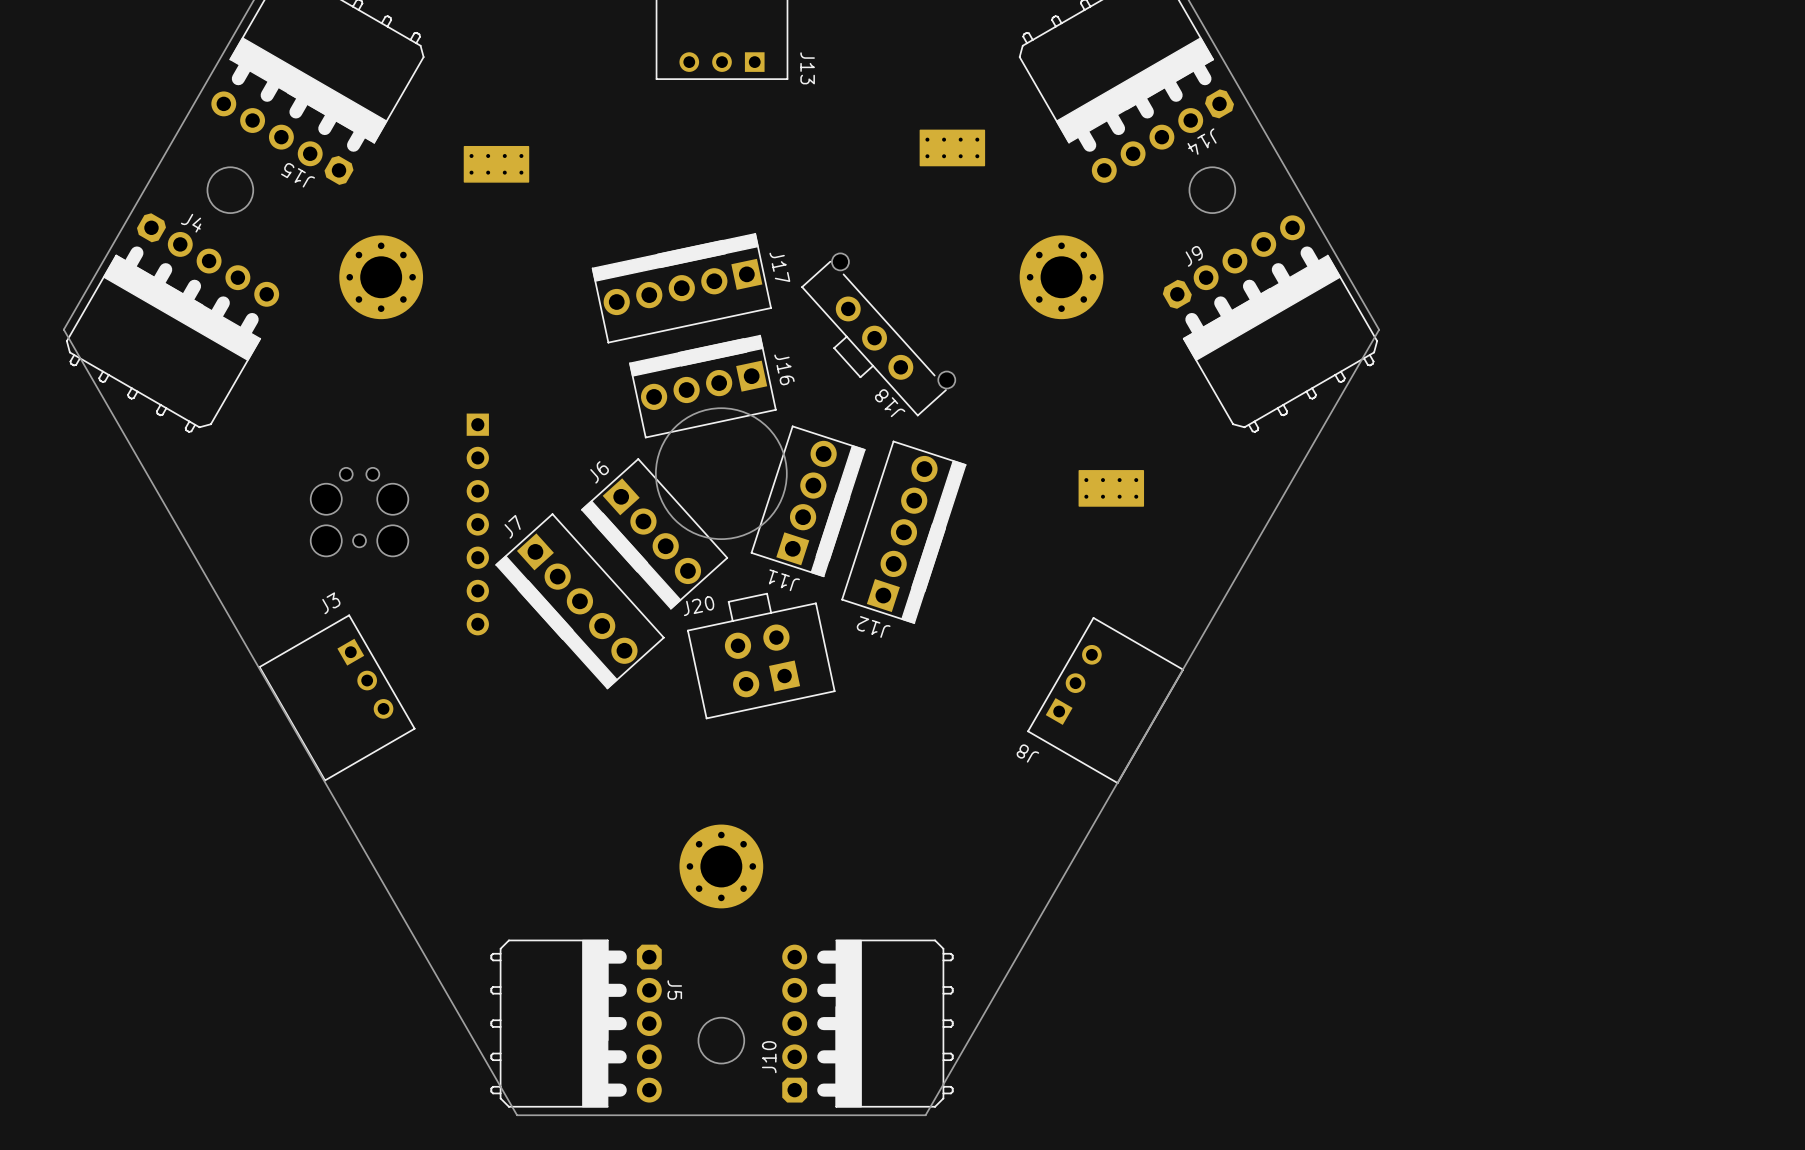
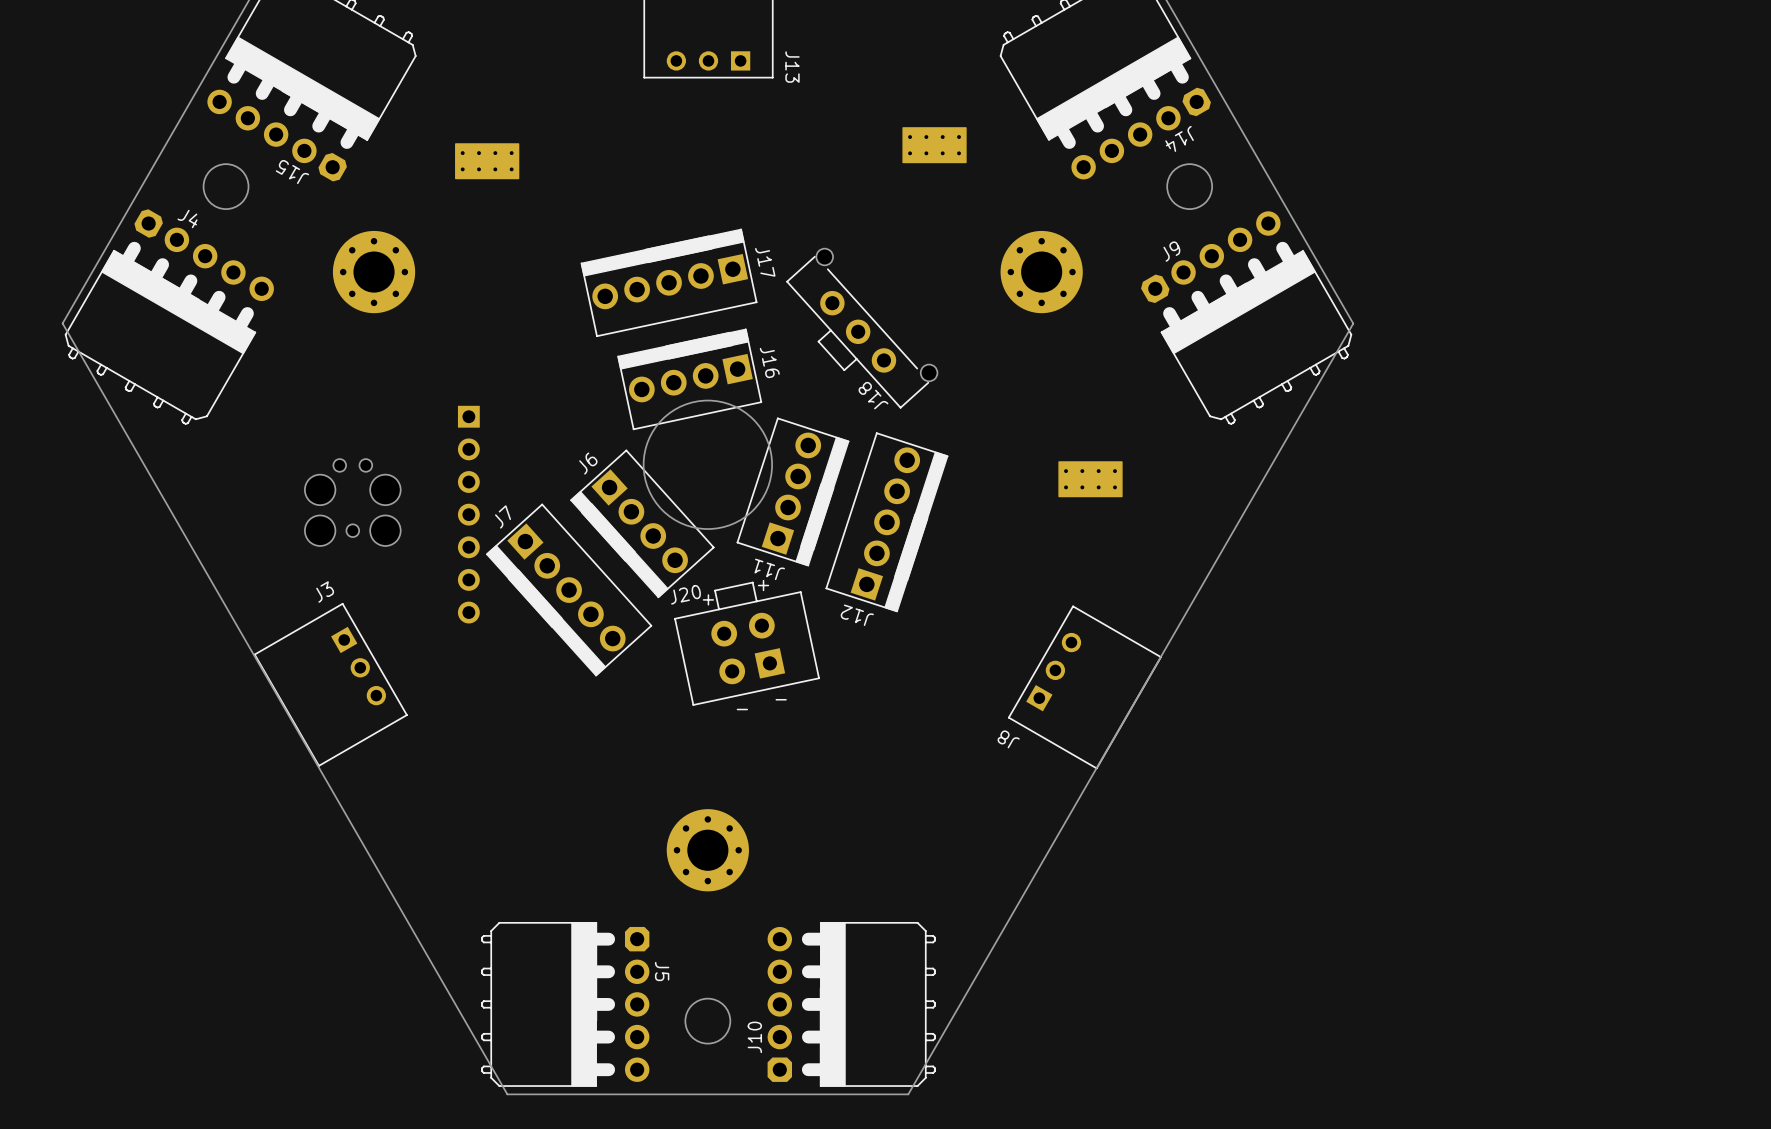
text: none -> + (763, 585)
text: none -> + (708, 599)
text: none -> - (781, 699)
text: none -> - (742, 709)

